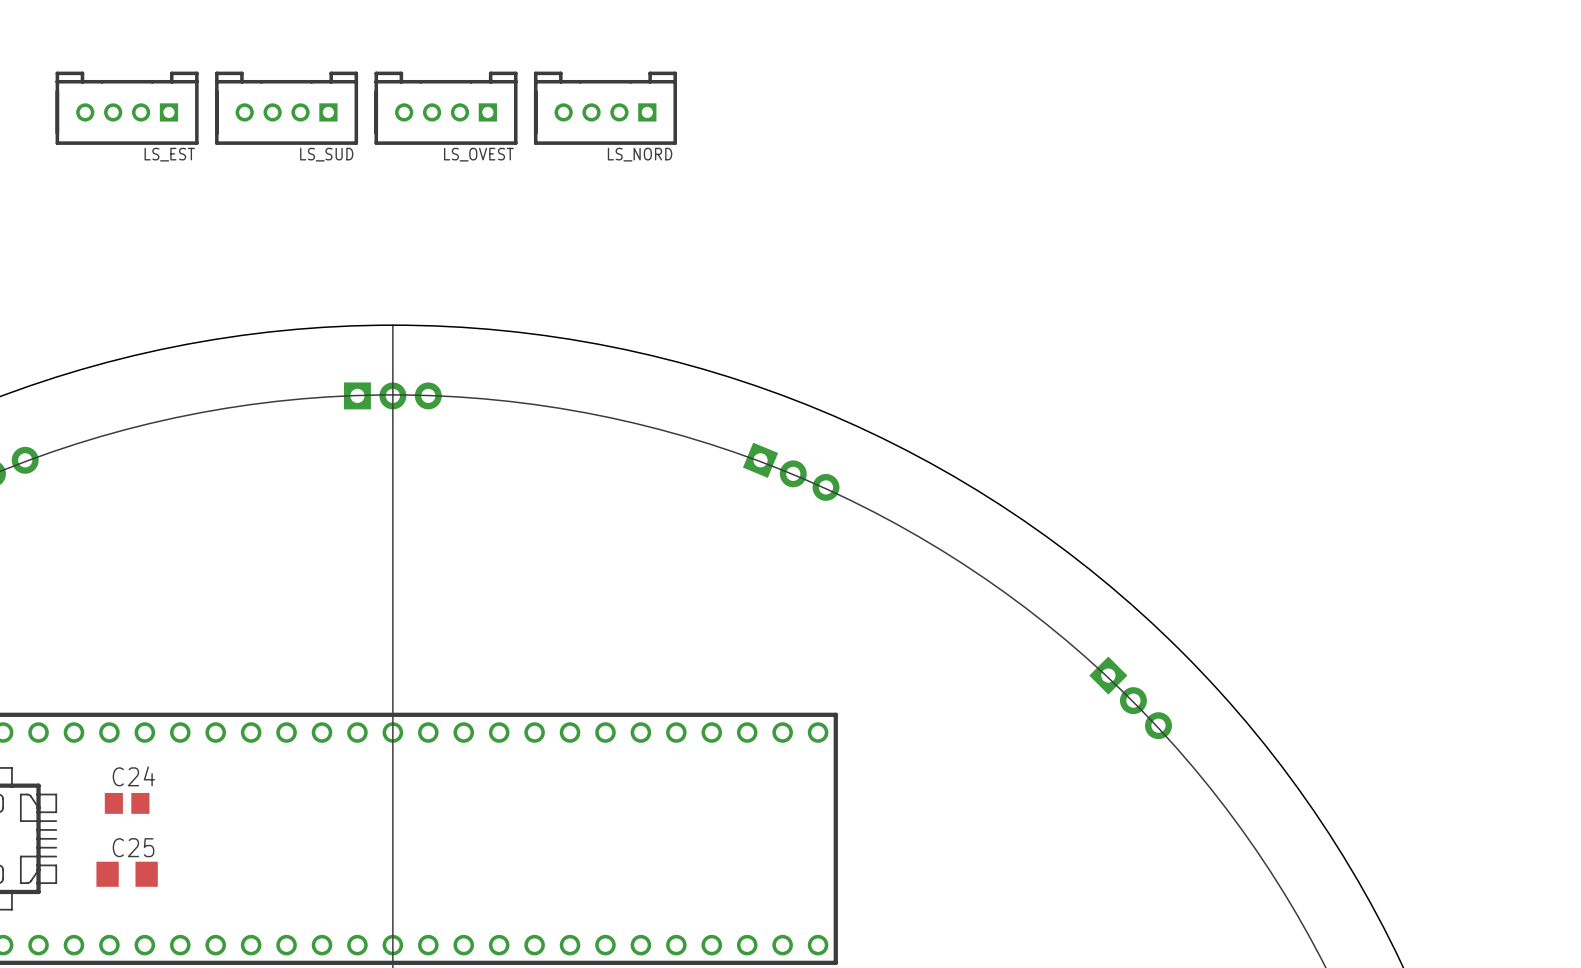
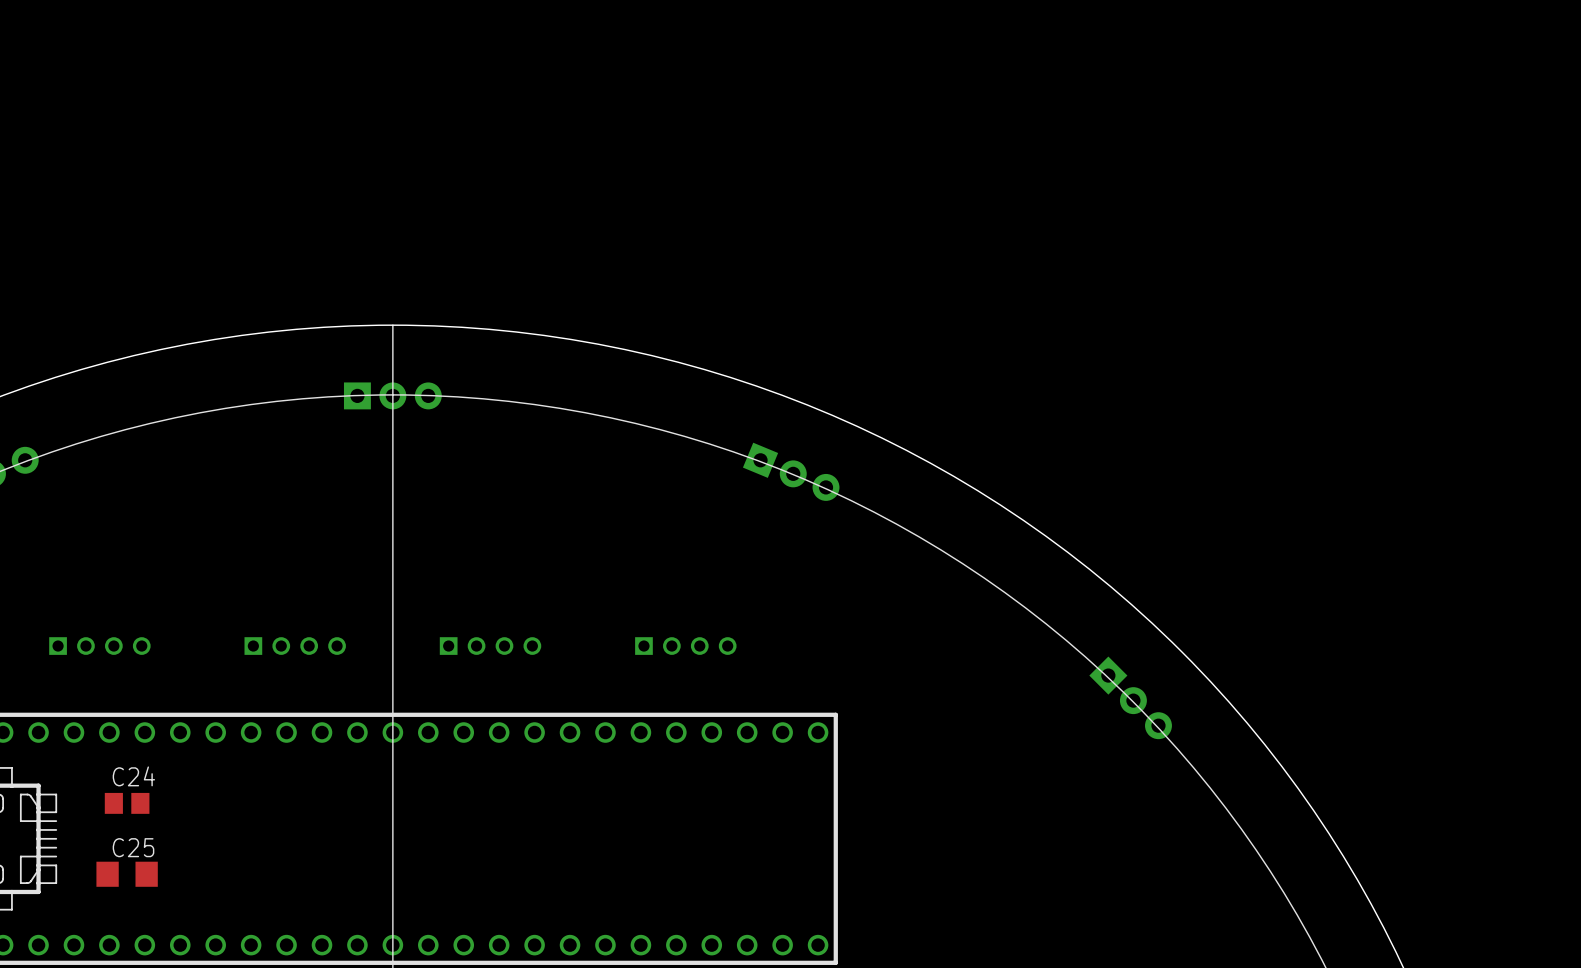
LS_EST: (127, 108) -> none
LS_SUD: (286, 108) -> none
LS_OVEST: (446, 108) -> none
LS_NORD: (605, 108) -> none
part: none -> (99, 646)
part: none -> (295, 646)
part: none -> (490, 646)
part: none -> (685, 646)

